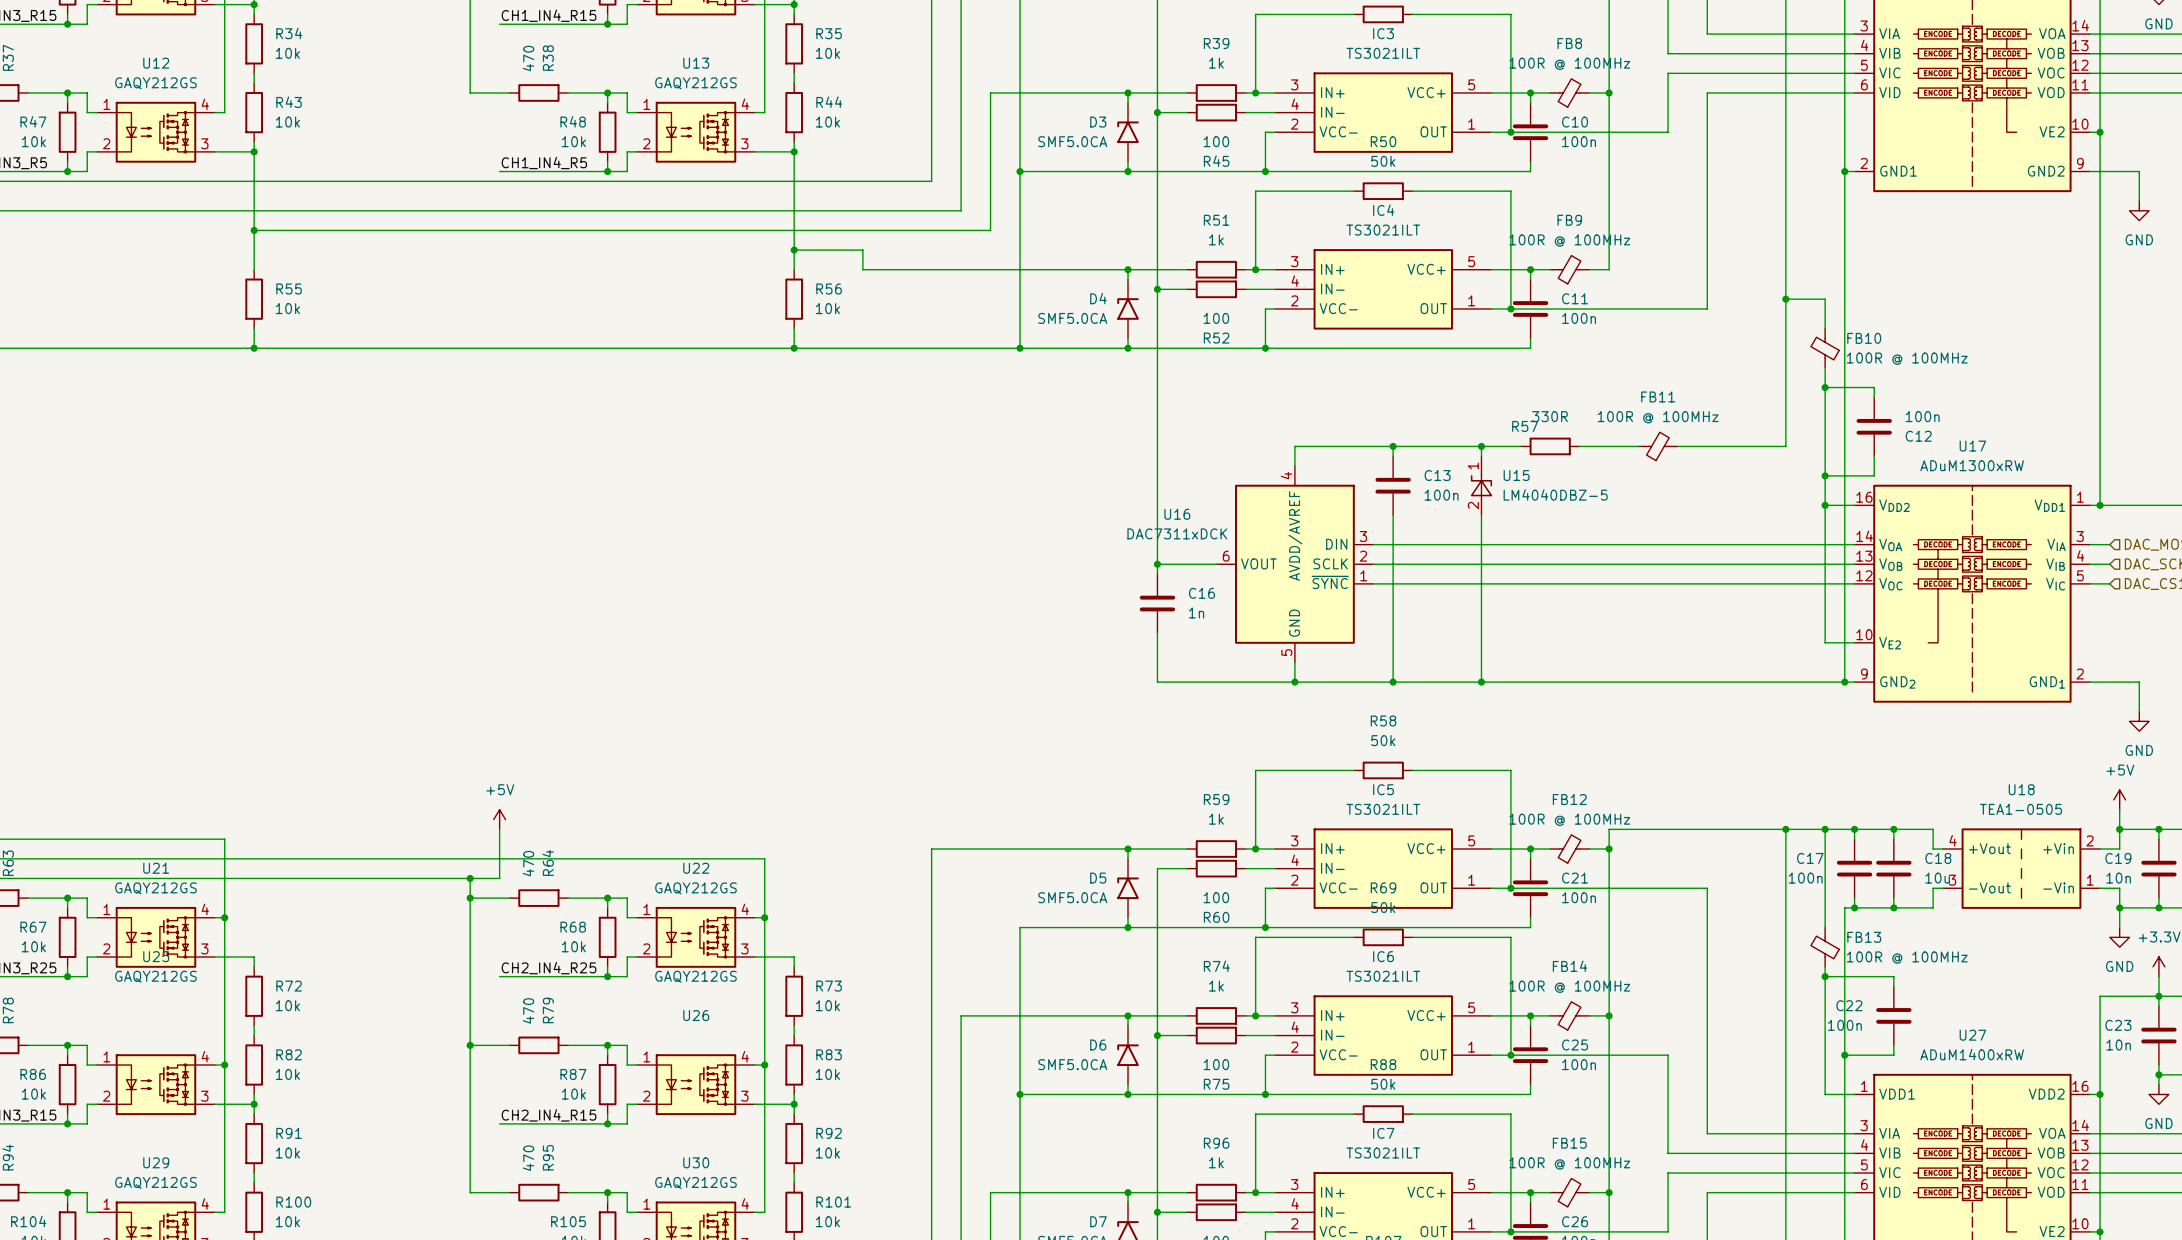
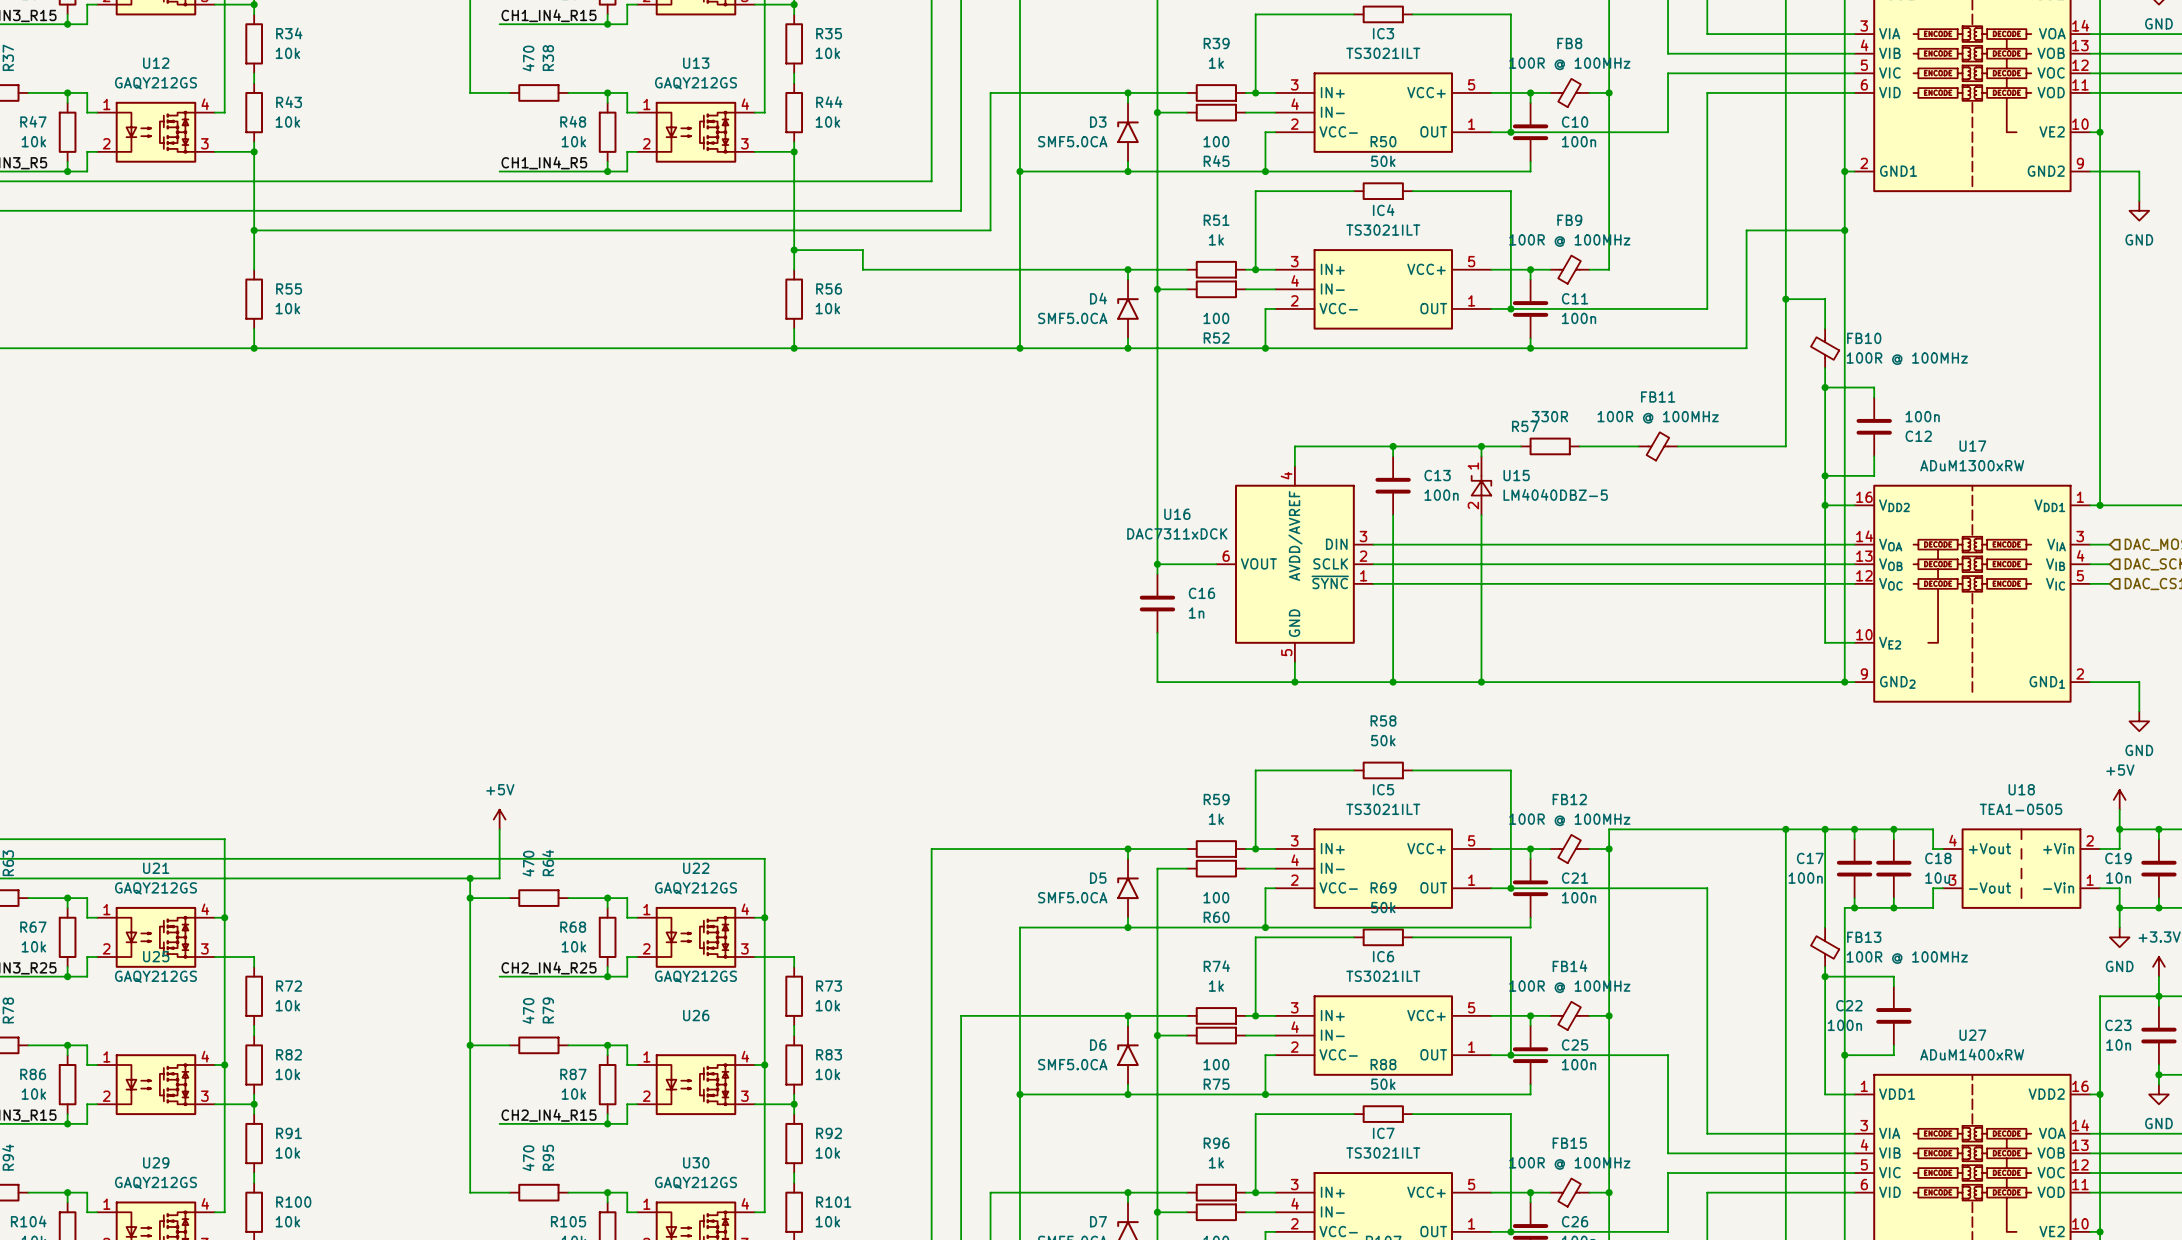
wire: none -> (1844, 230) (1746, 230) (1746, 348) (1530, 348)
junction: none -> (1844, 230)
junction: none -> (1530, 348)

